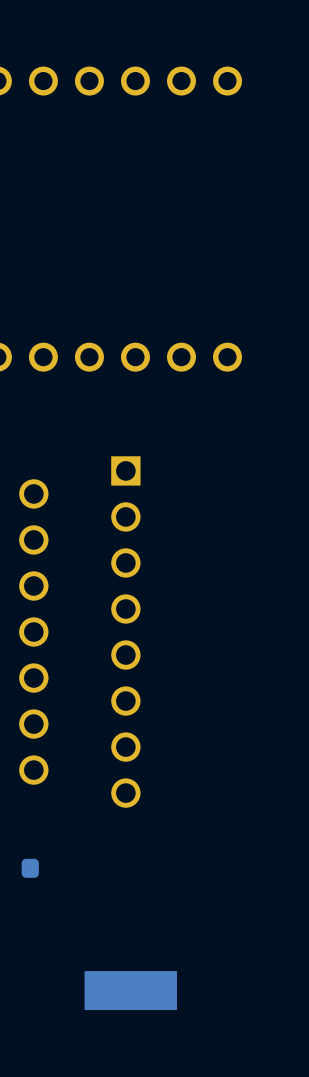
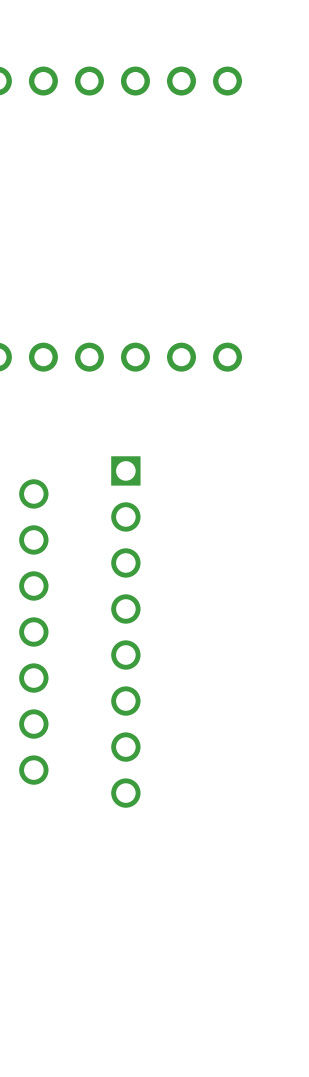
part: (30, 868) -> none
part: (130, 990) -> none

